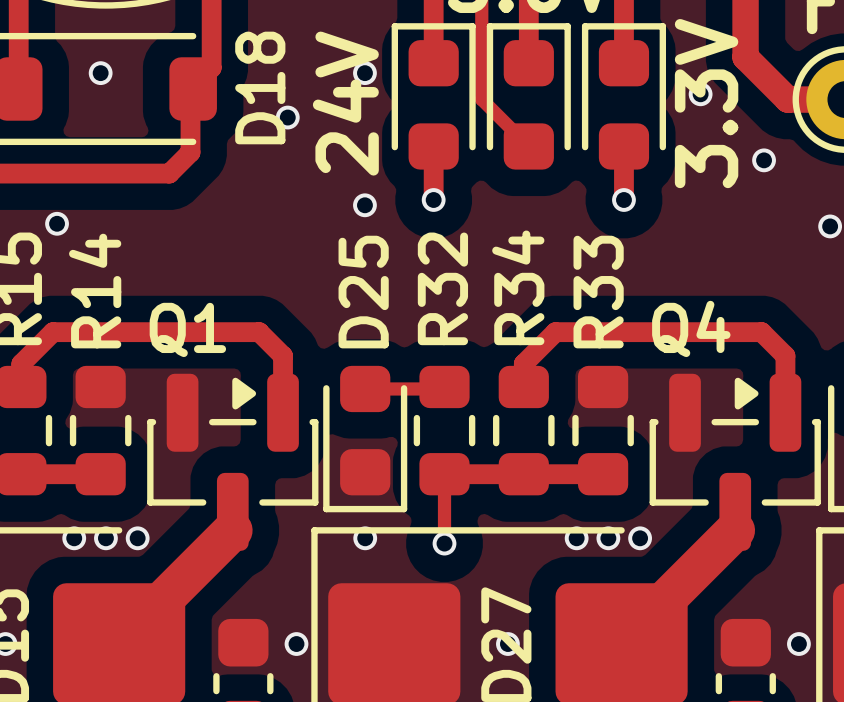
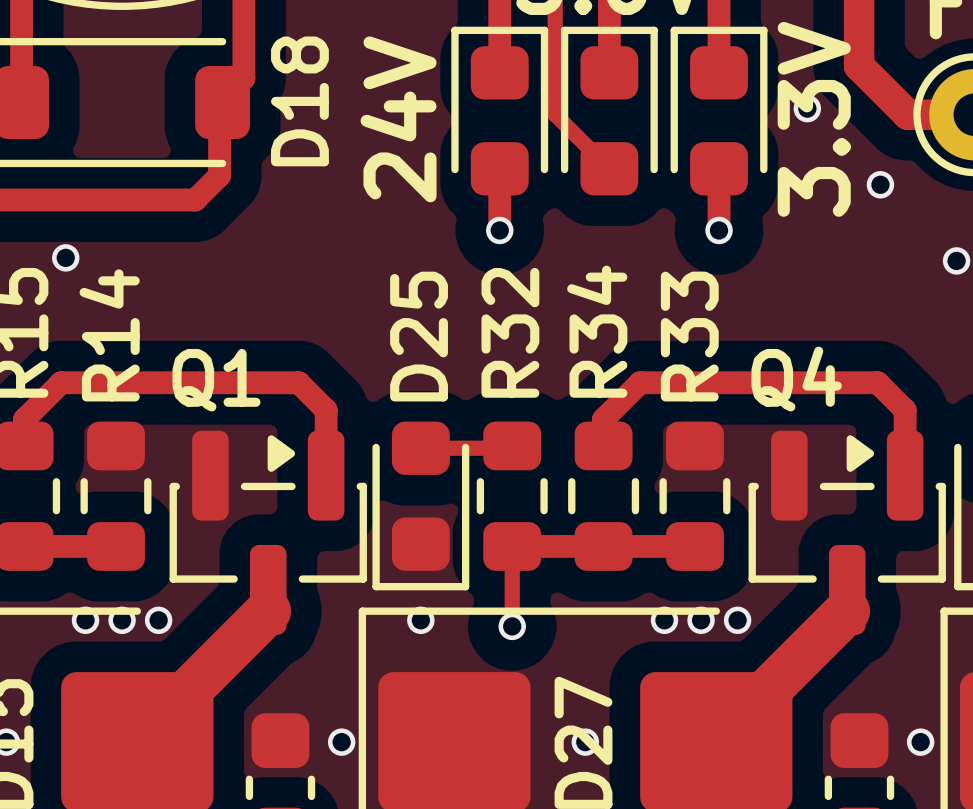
via: (100, 73) -> none
via: (364, 73) -> none
via: (287, 117) -> none
via: (364, 205) -> none

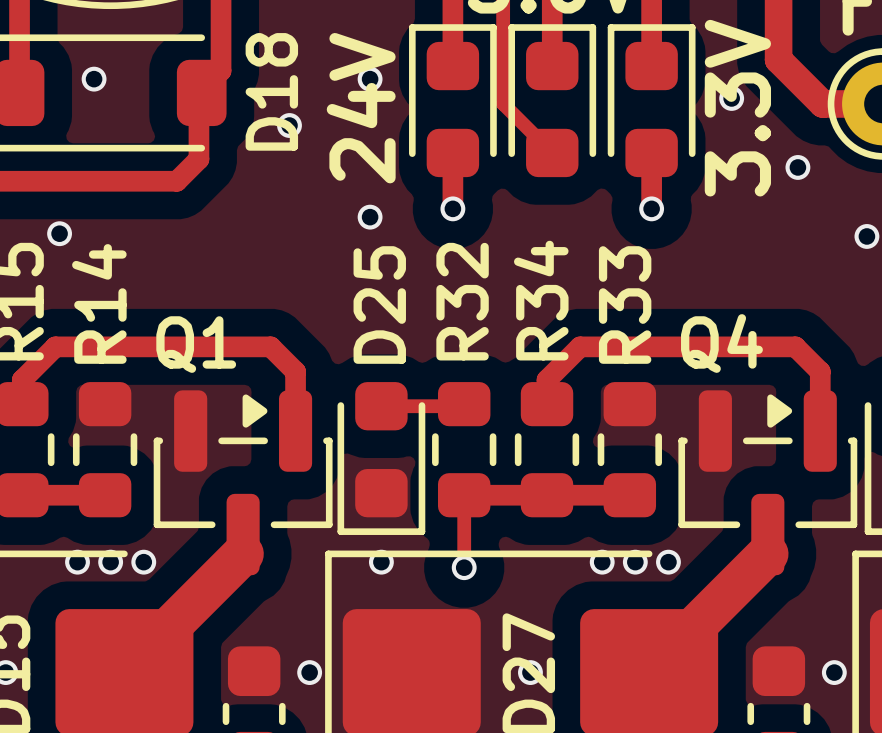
via: none -> (94, 79)
via: none -> (370, 79)
via: none -> (289, 125)
via: none -> (370, 217)

